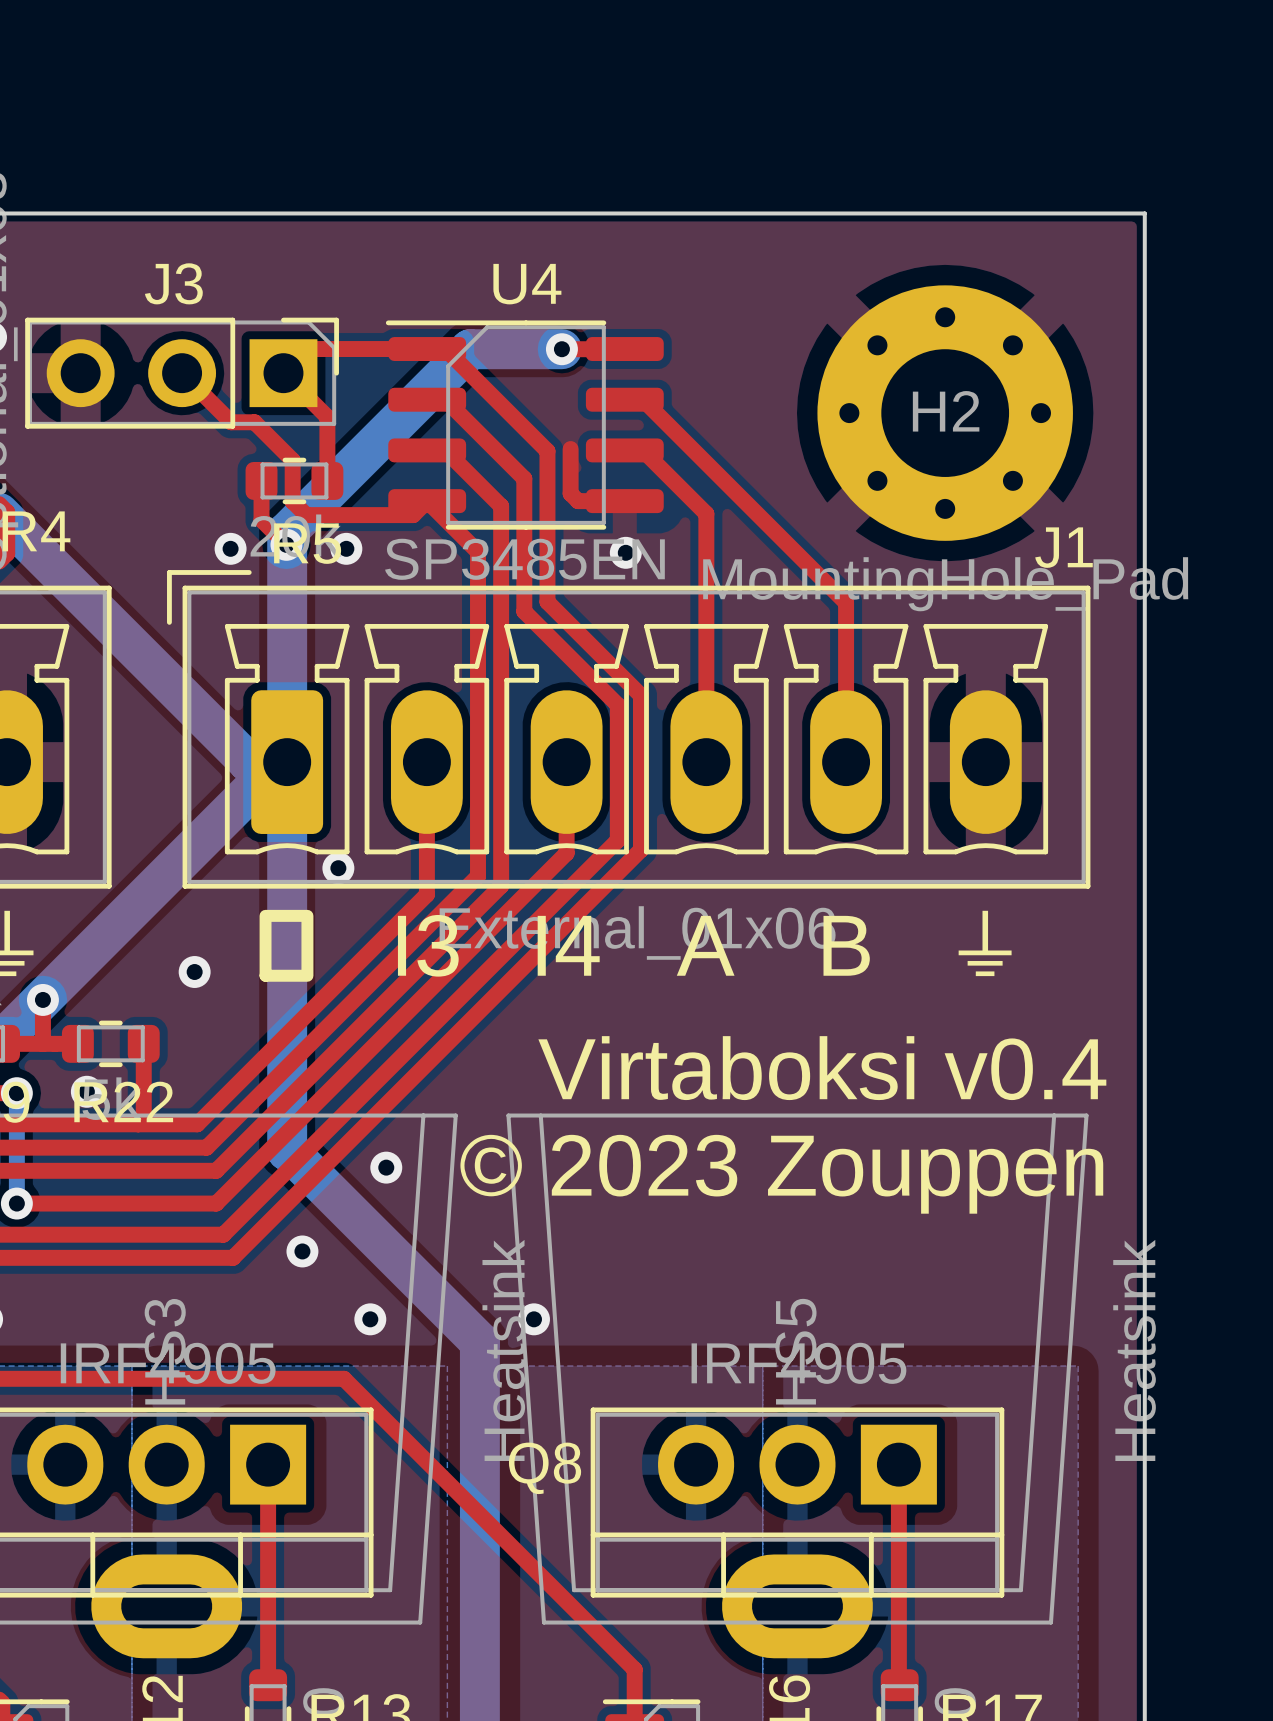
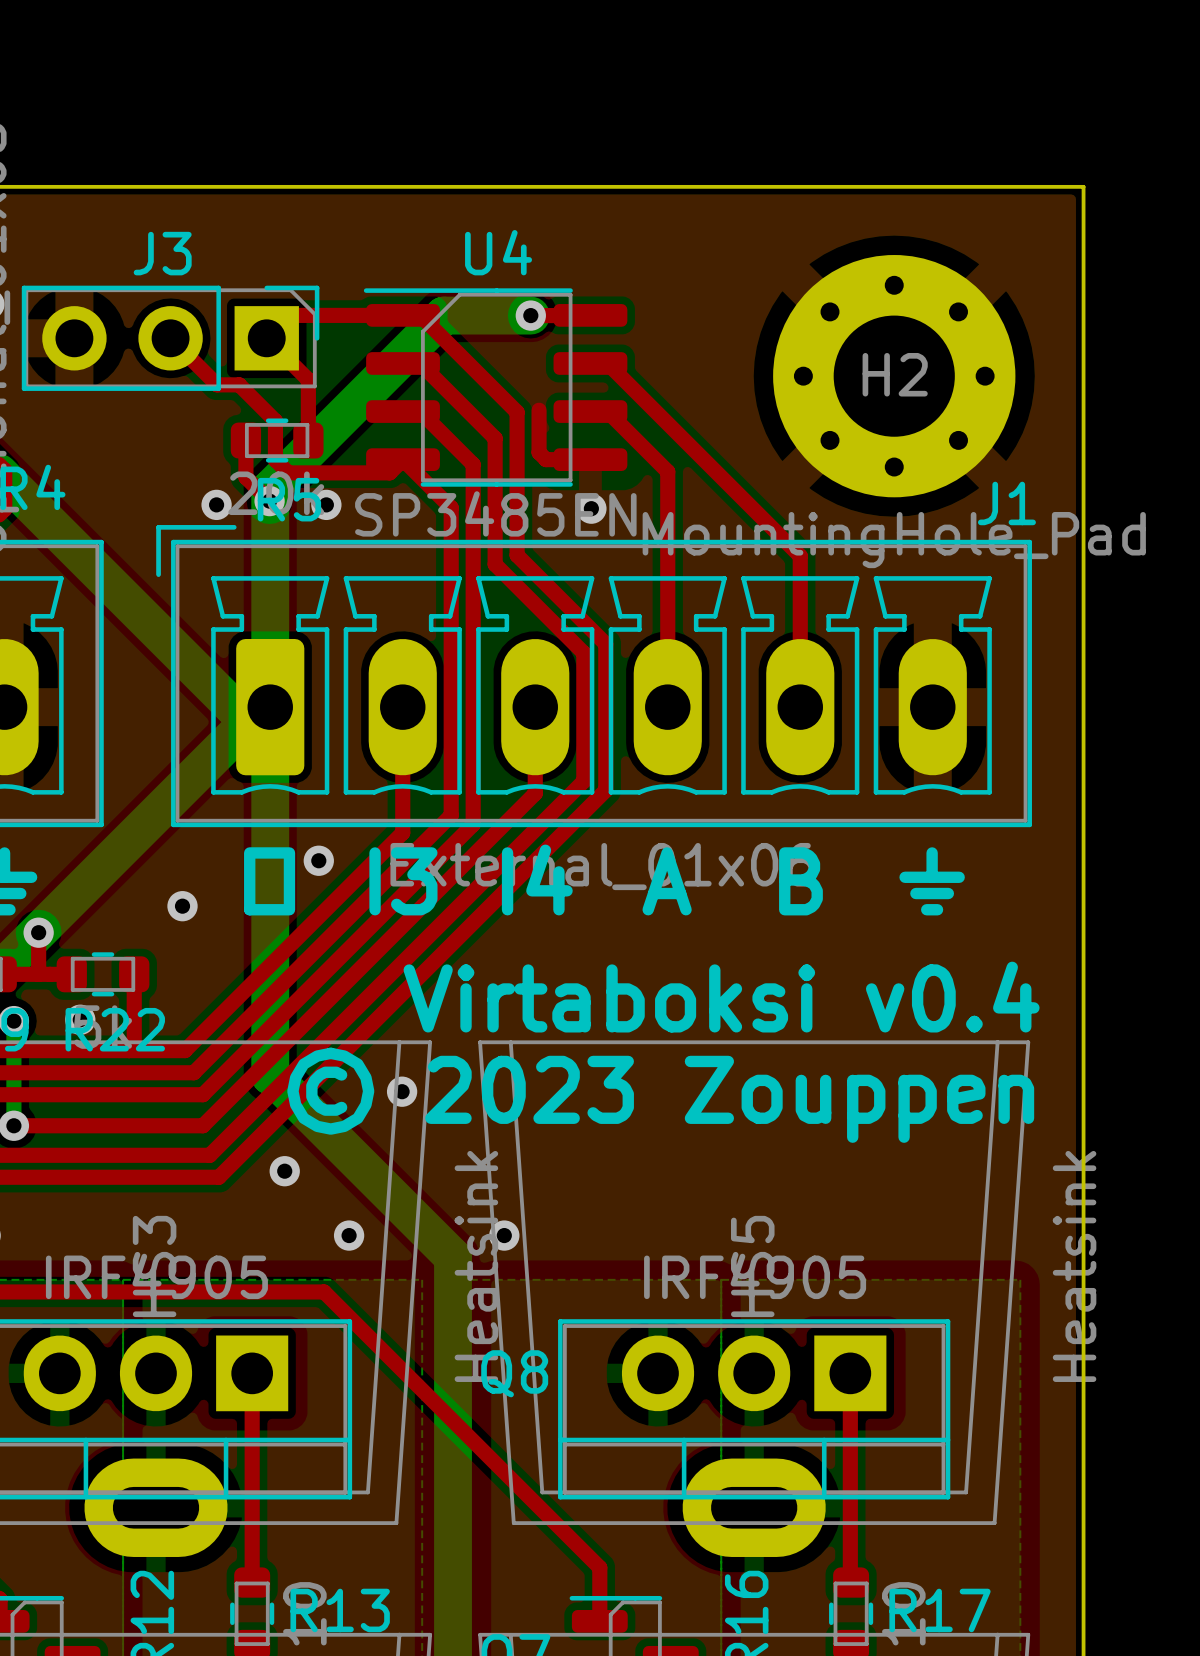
via position: (338, 868) -> (318, 860)
via position: (386, 1167) -> (402, 1091)

